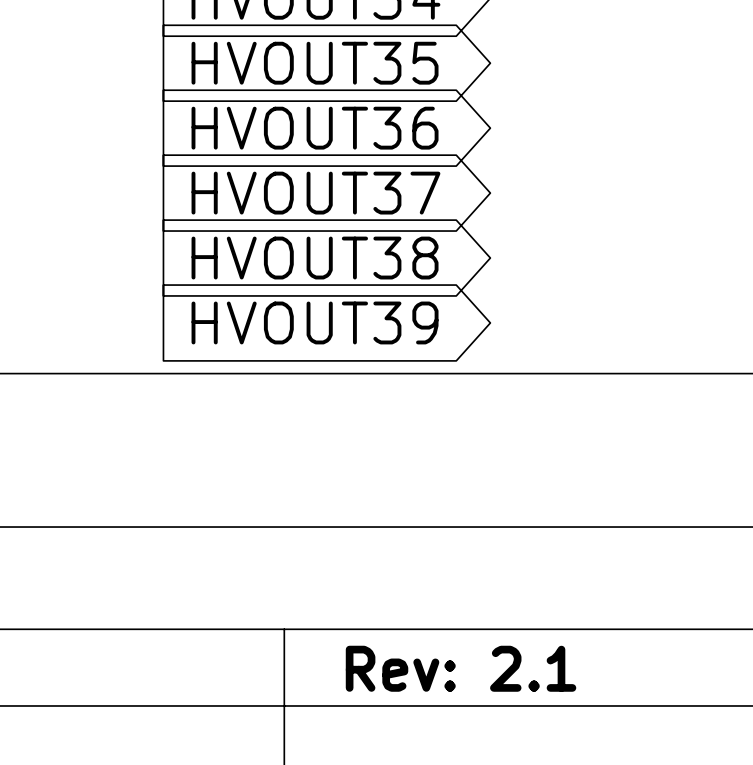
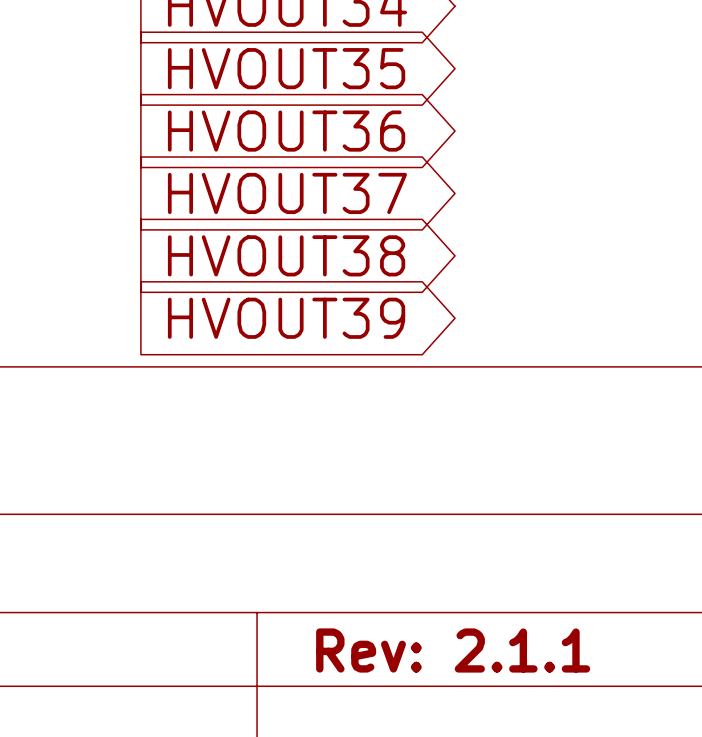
title block: Rev: 2.1 (461, 668) -> Rev: 2.1.1 (453, 650)

